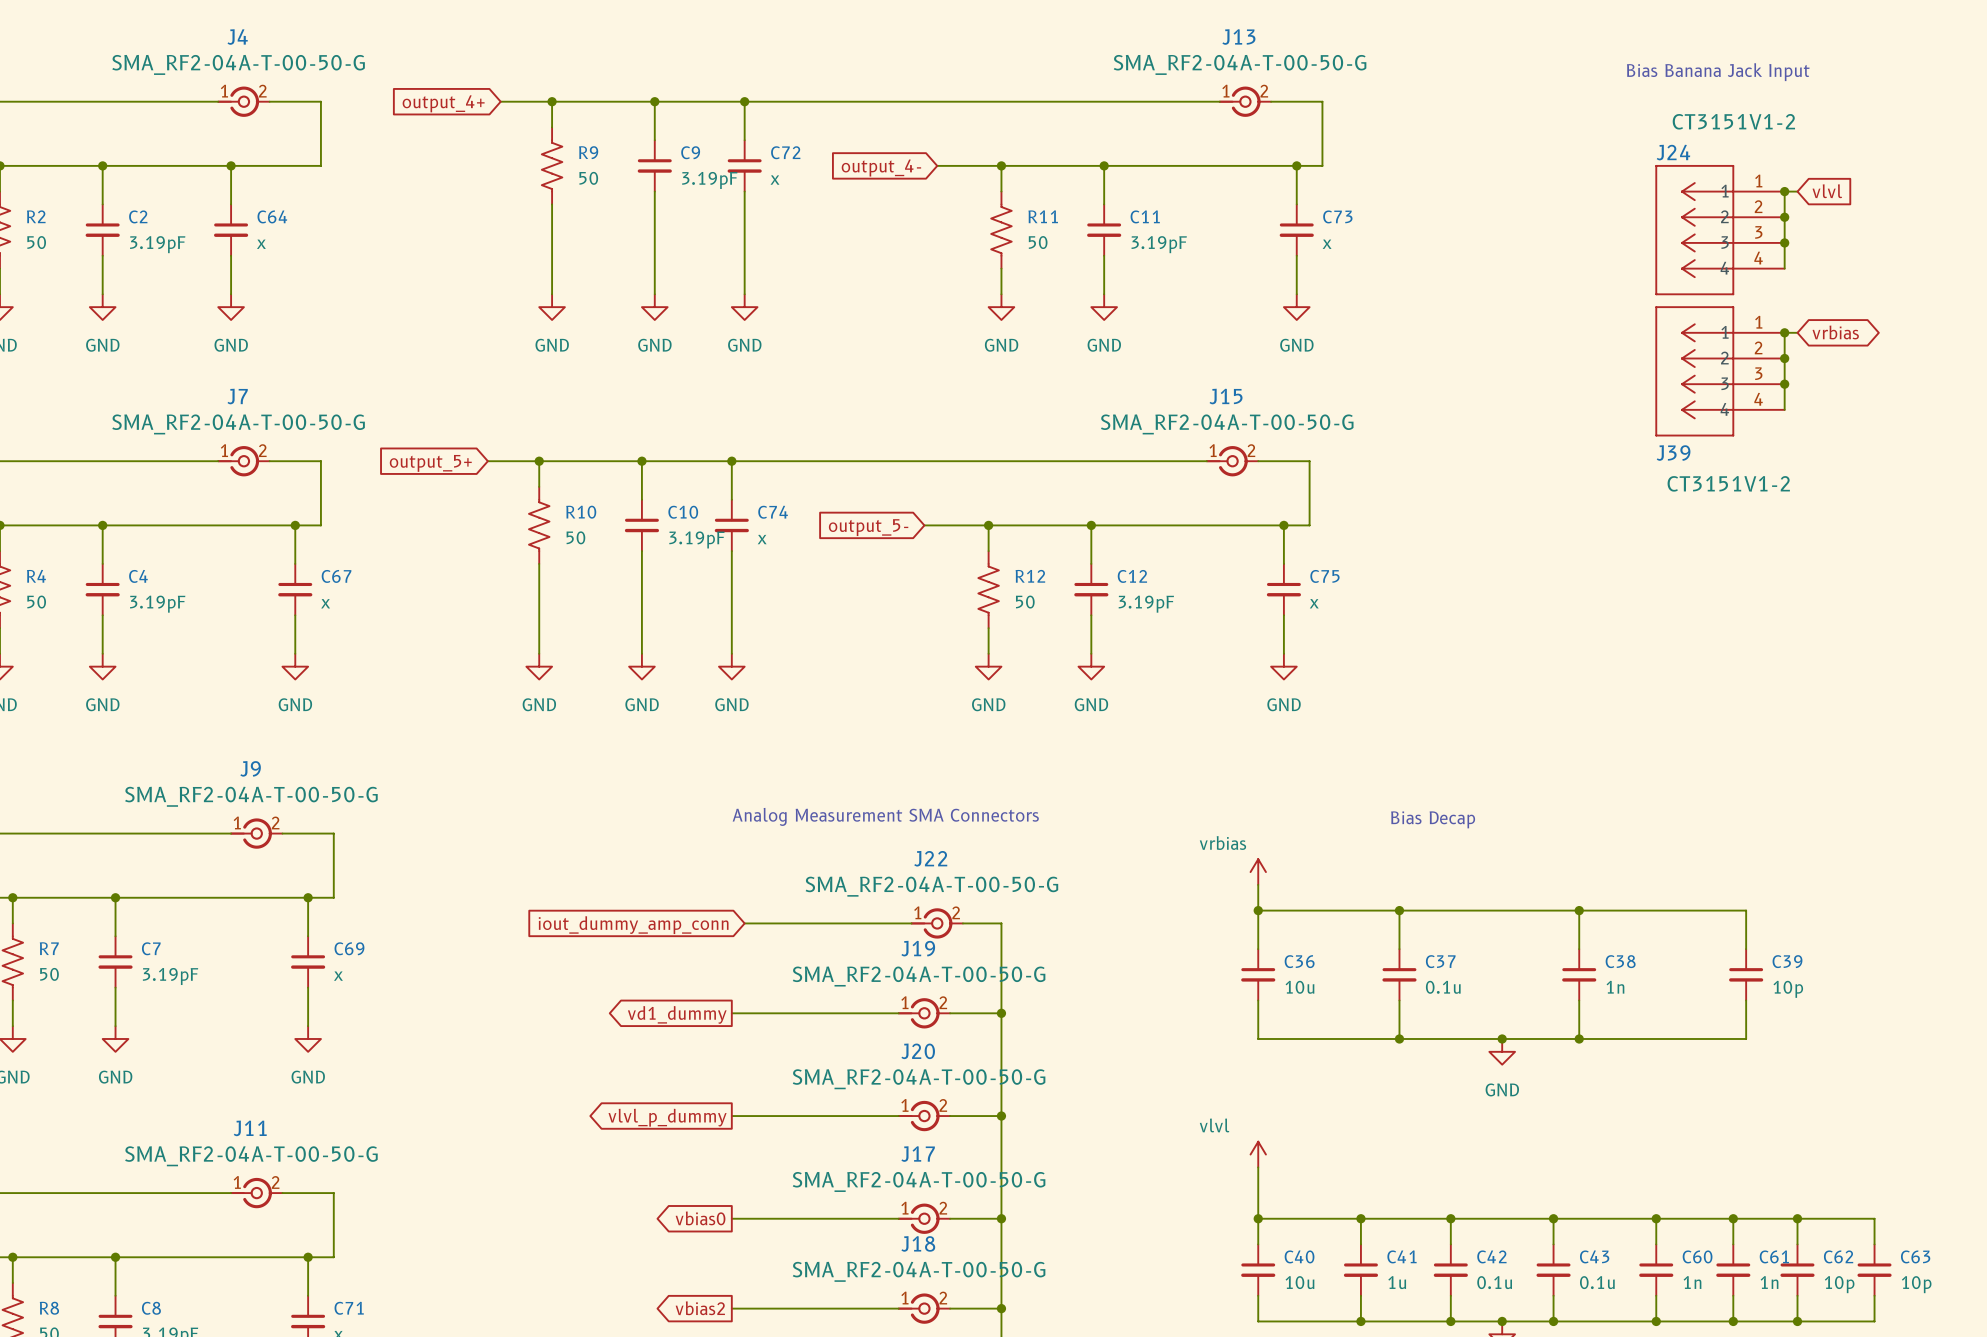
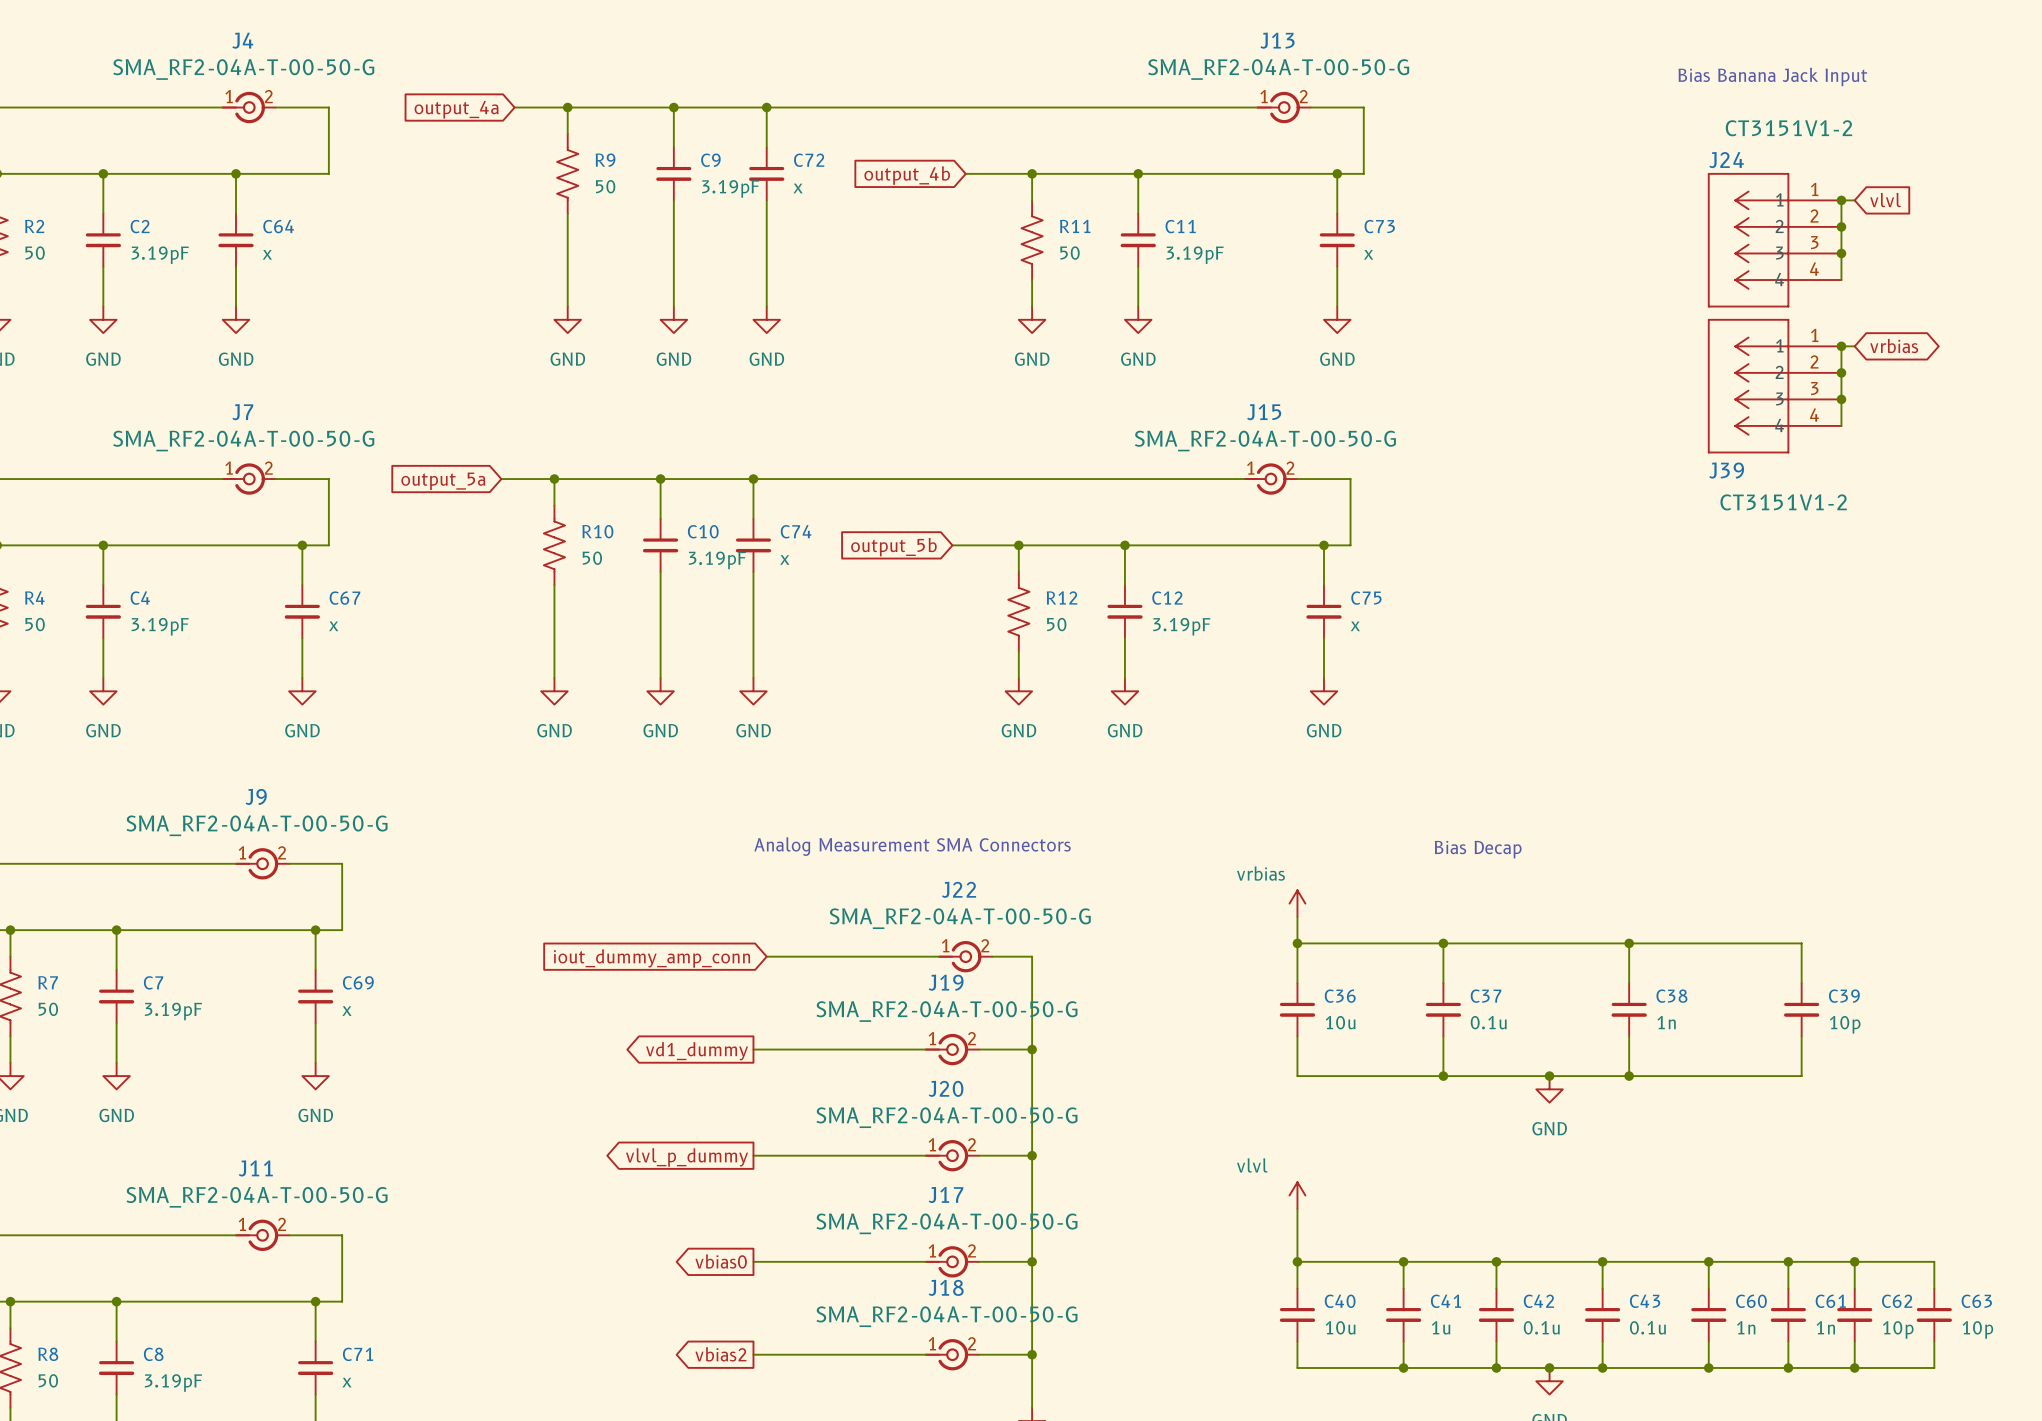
global label: output_4+ (443, 103) -> output_4a (456, 109)
global label: output_4- (881, 168) -> output_4b (907, 175)
global label: output_5+ (430, 463) -> output_5a (443, 481)
global label: output_5- (868, 527) -> output_5b (893, 547)

